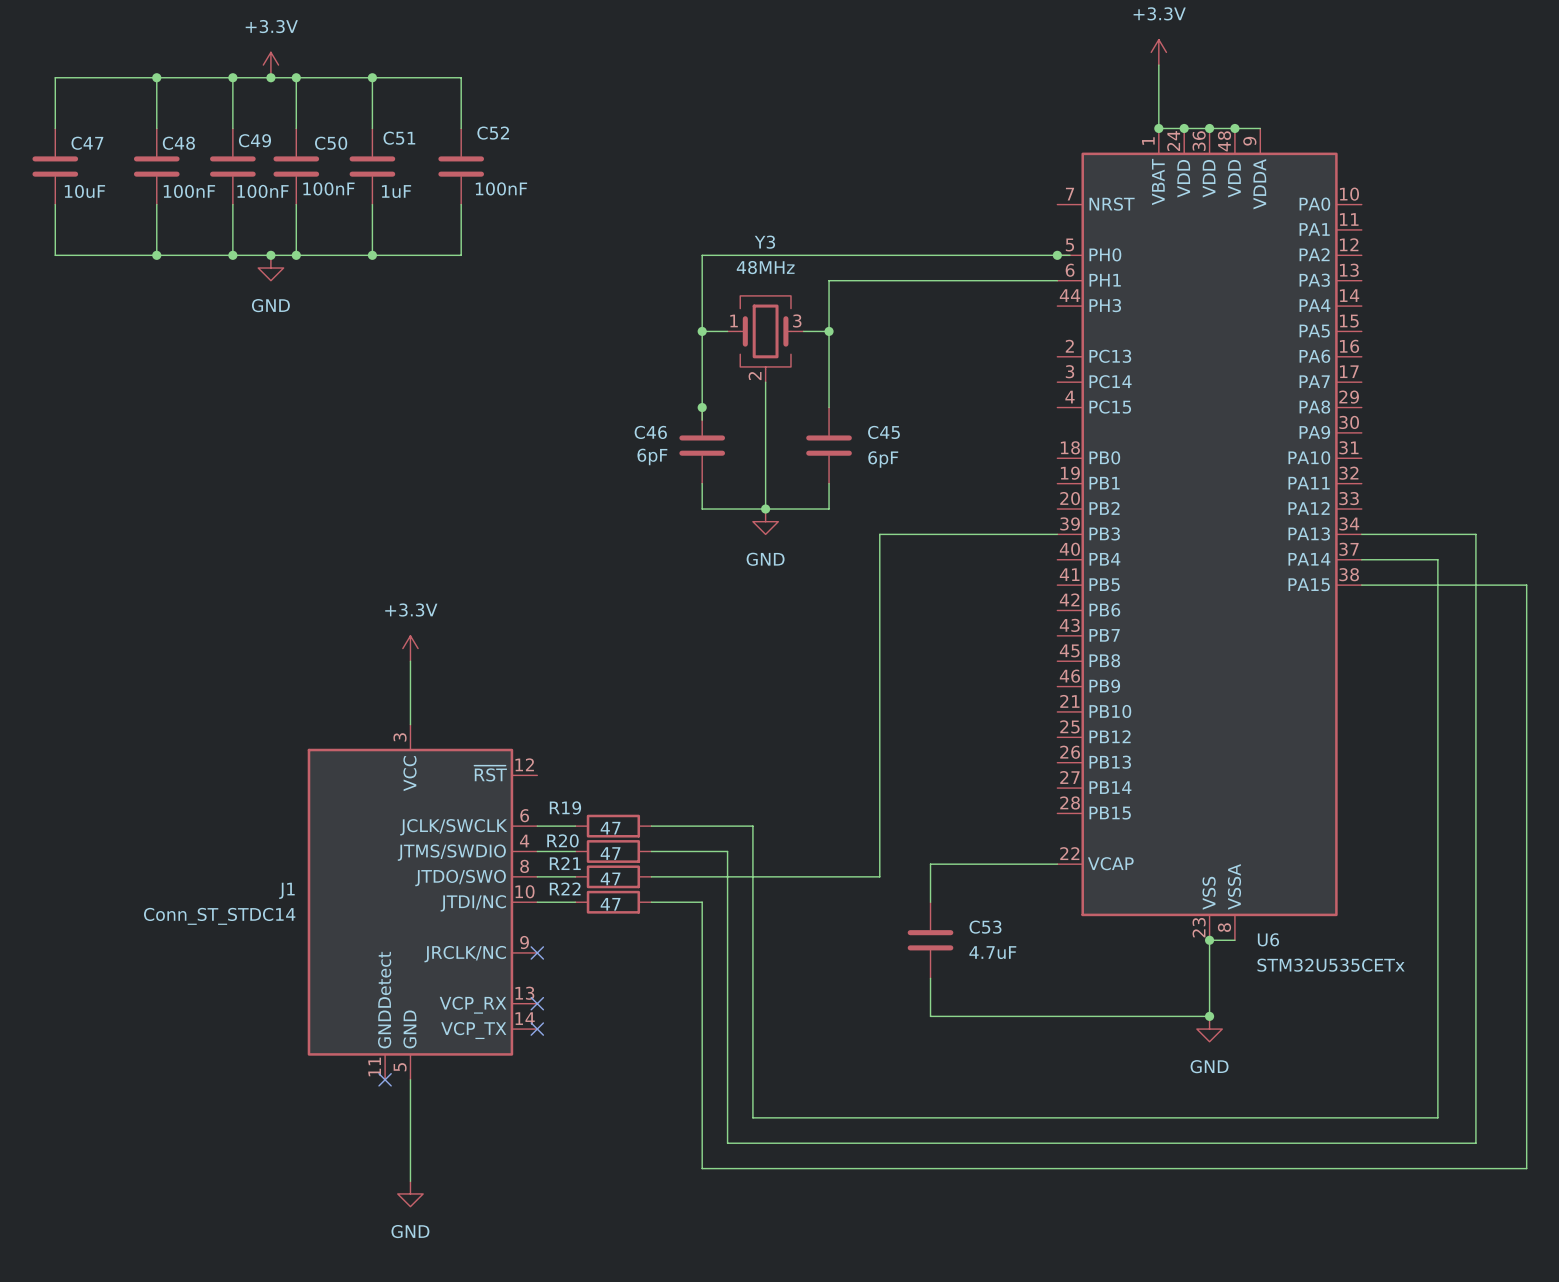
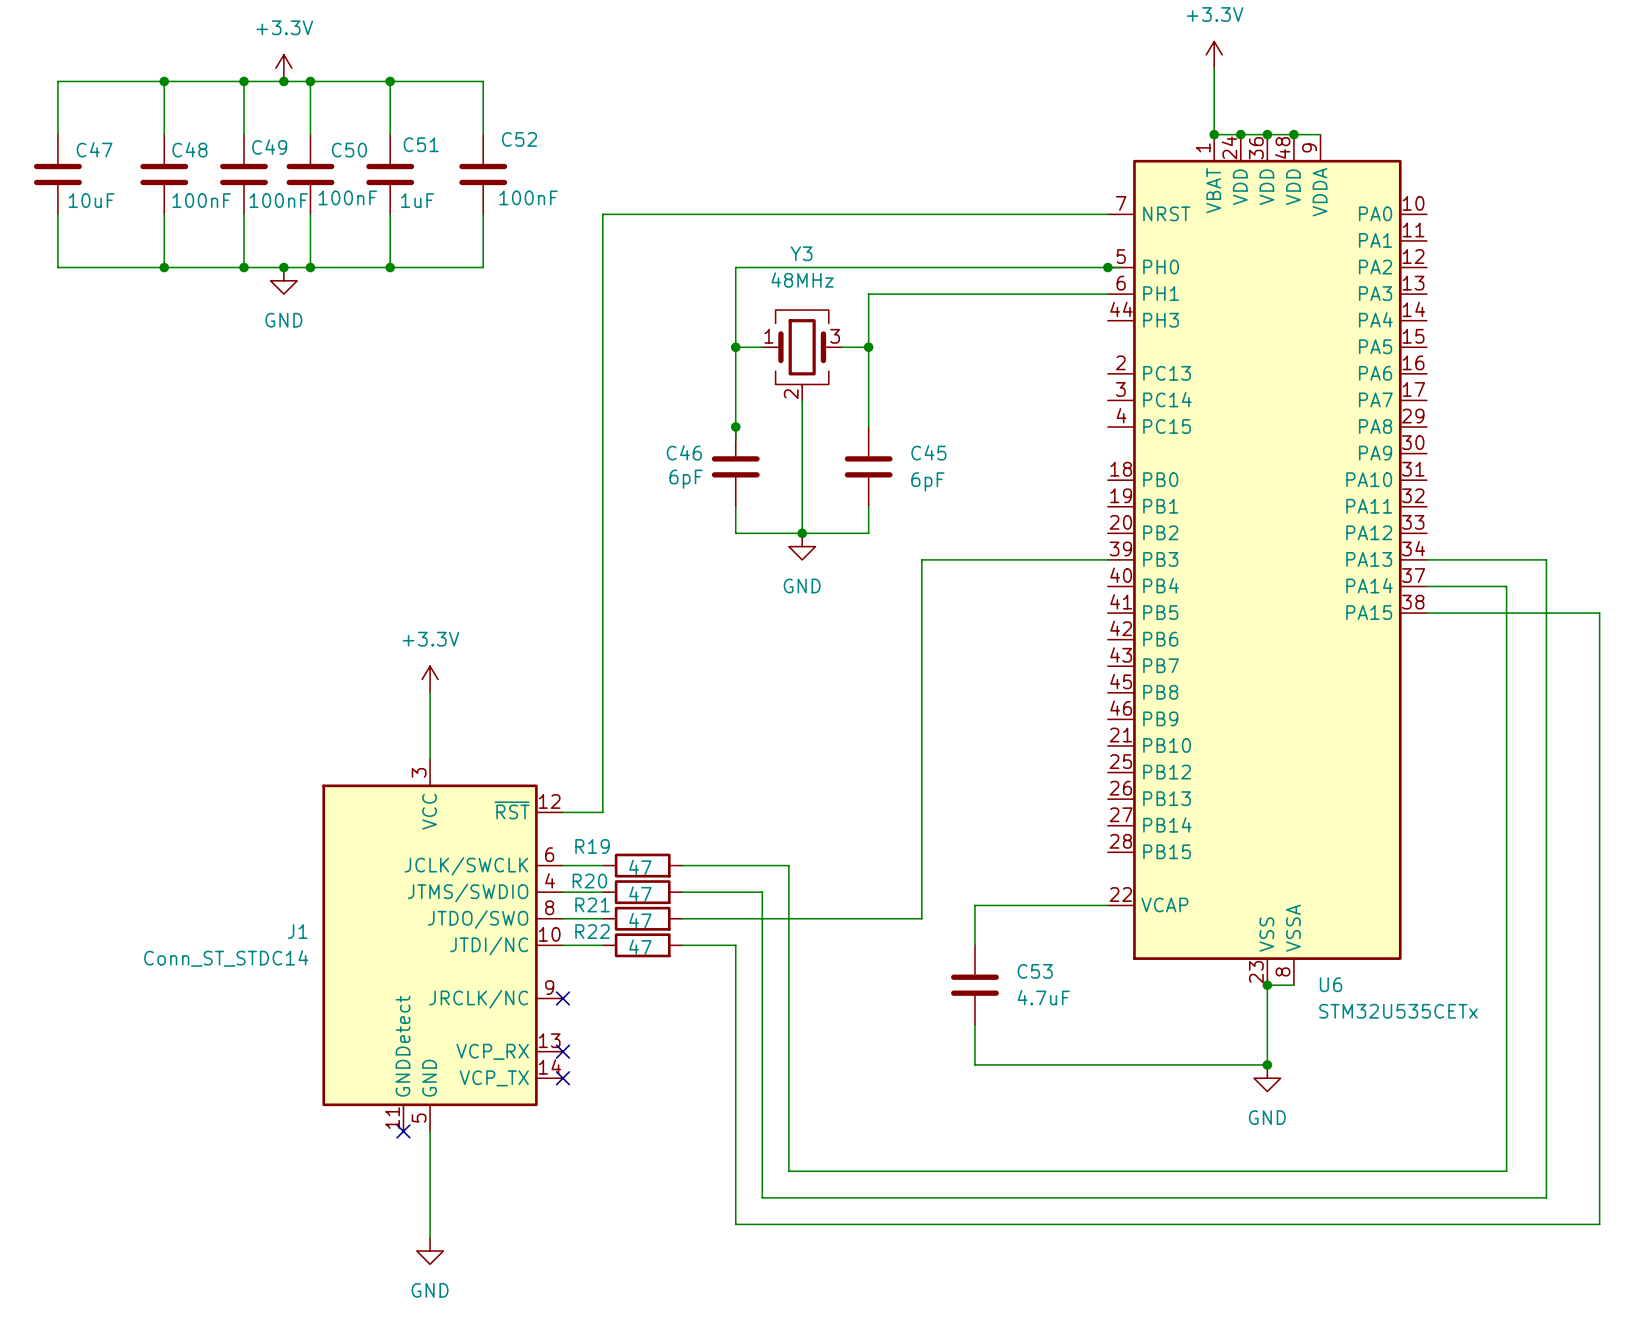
wire: none -> (1107, 214) (602, 214) (602, 812) (562, 812)

